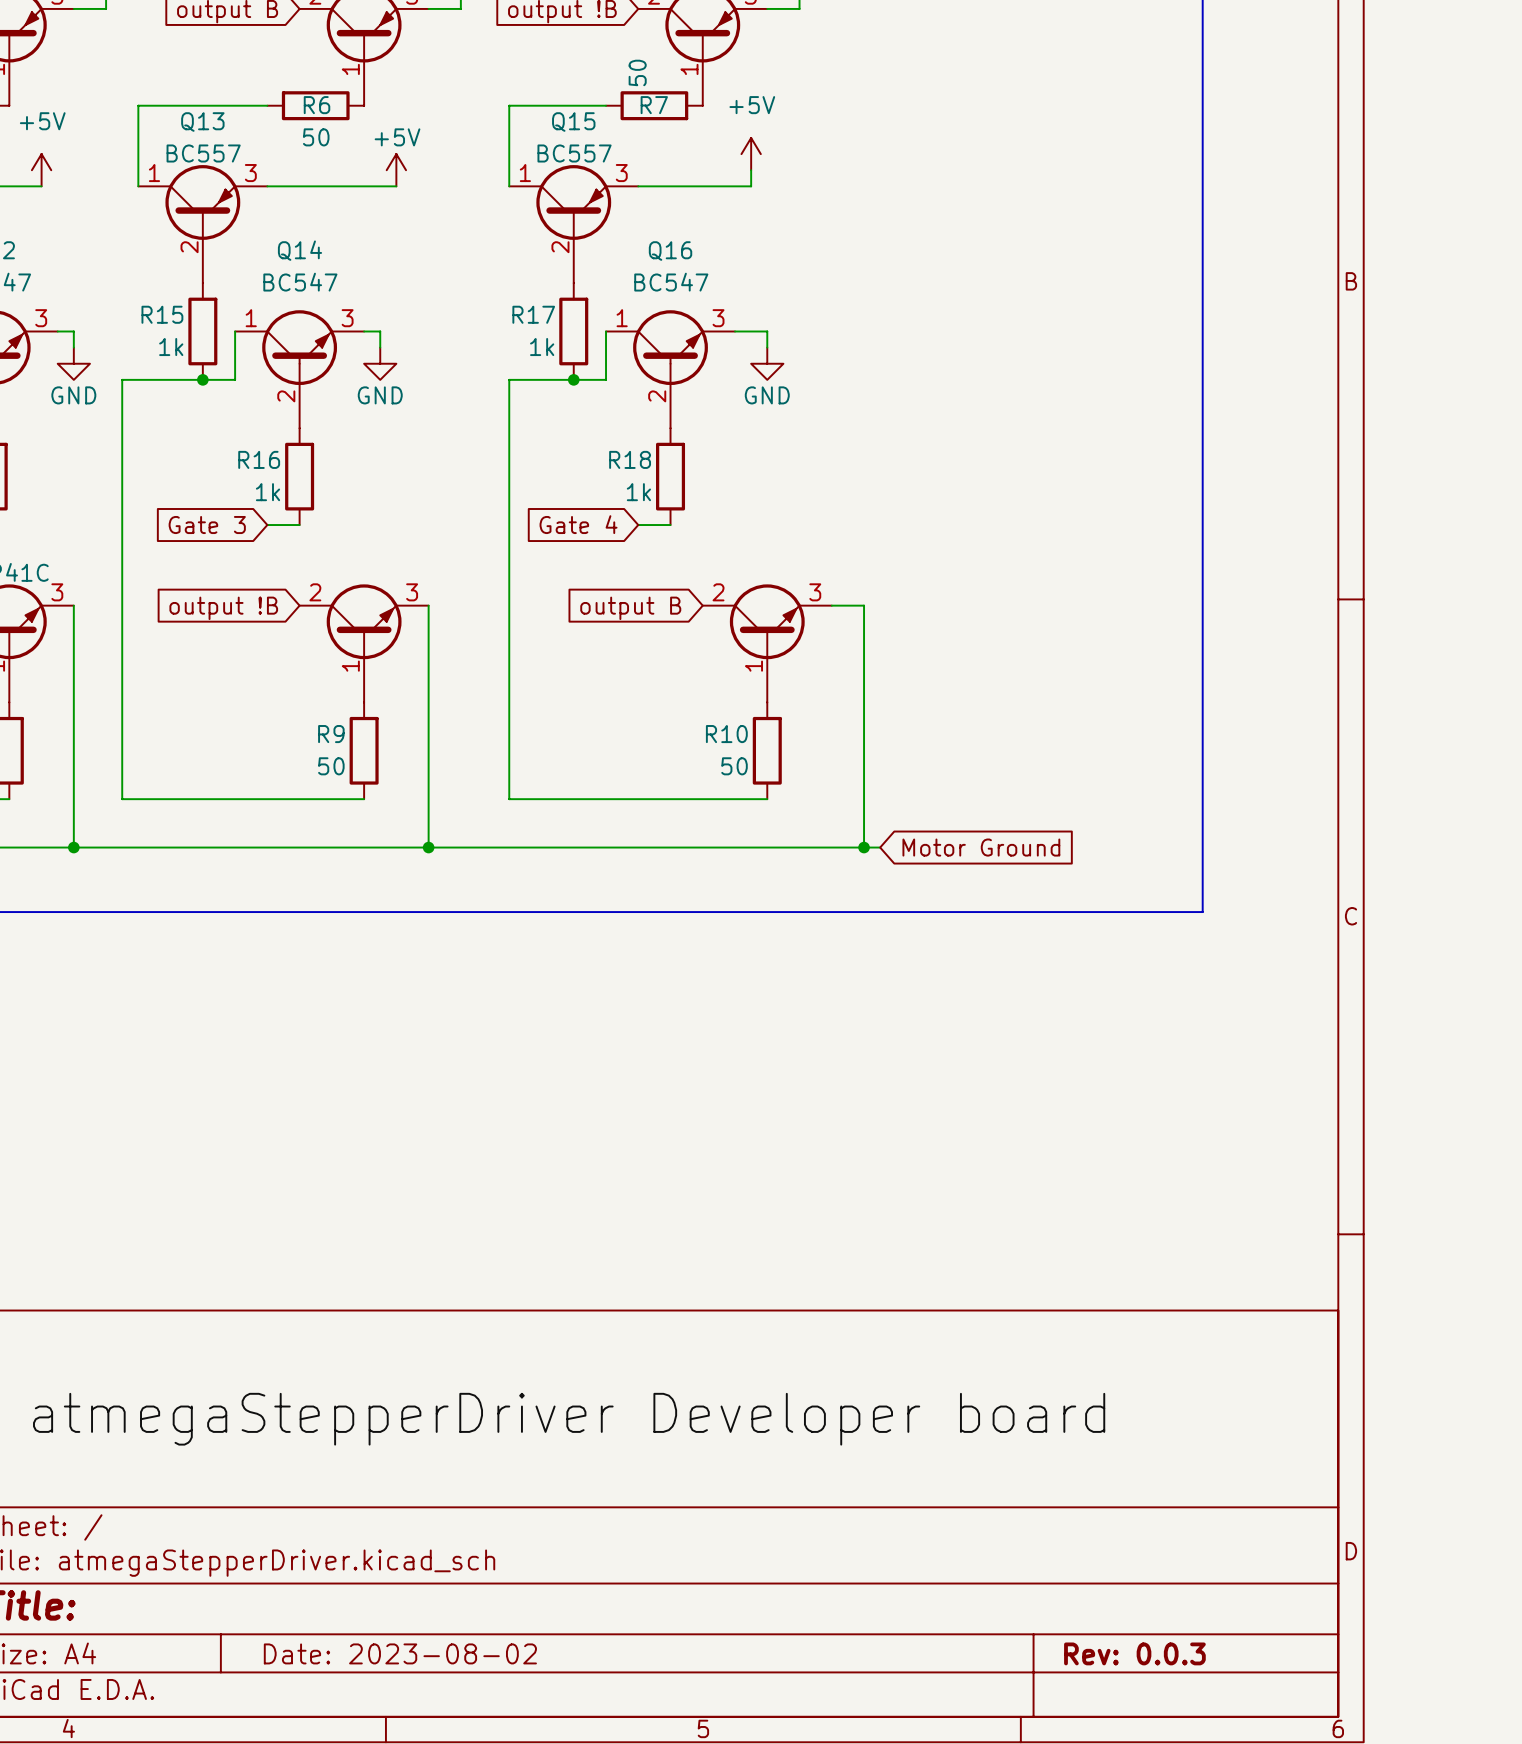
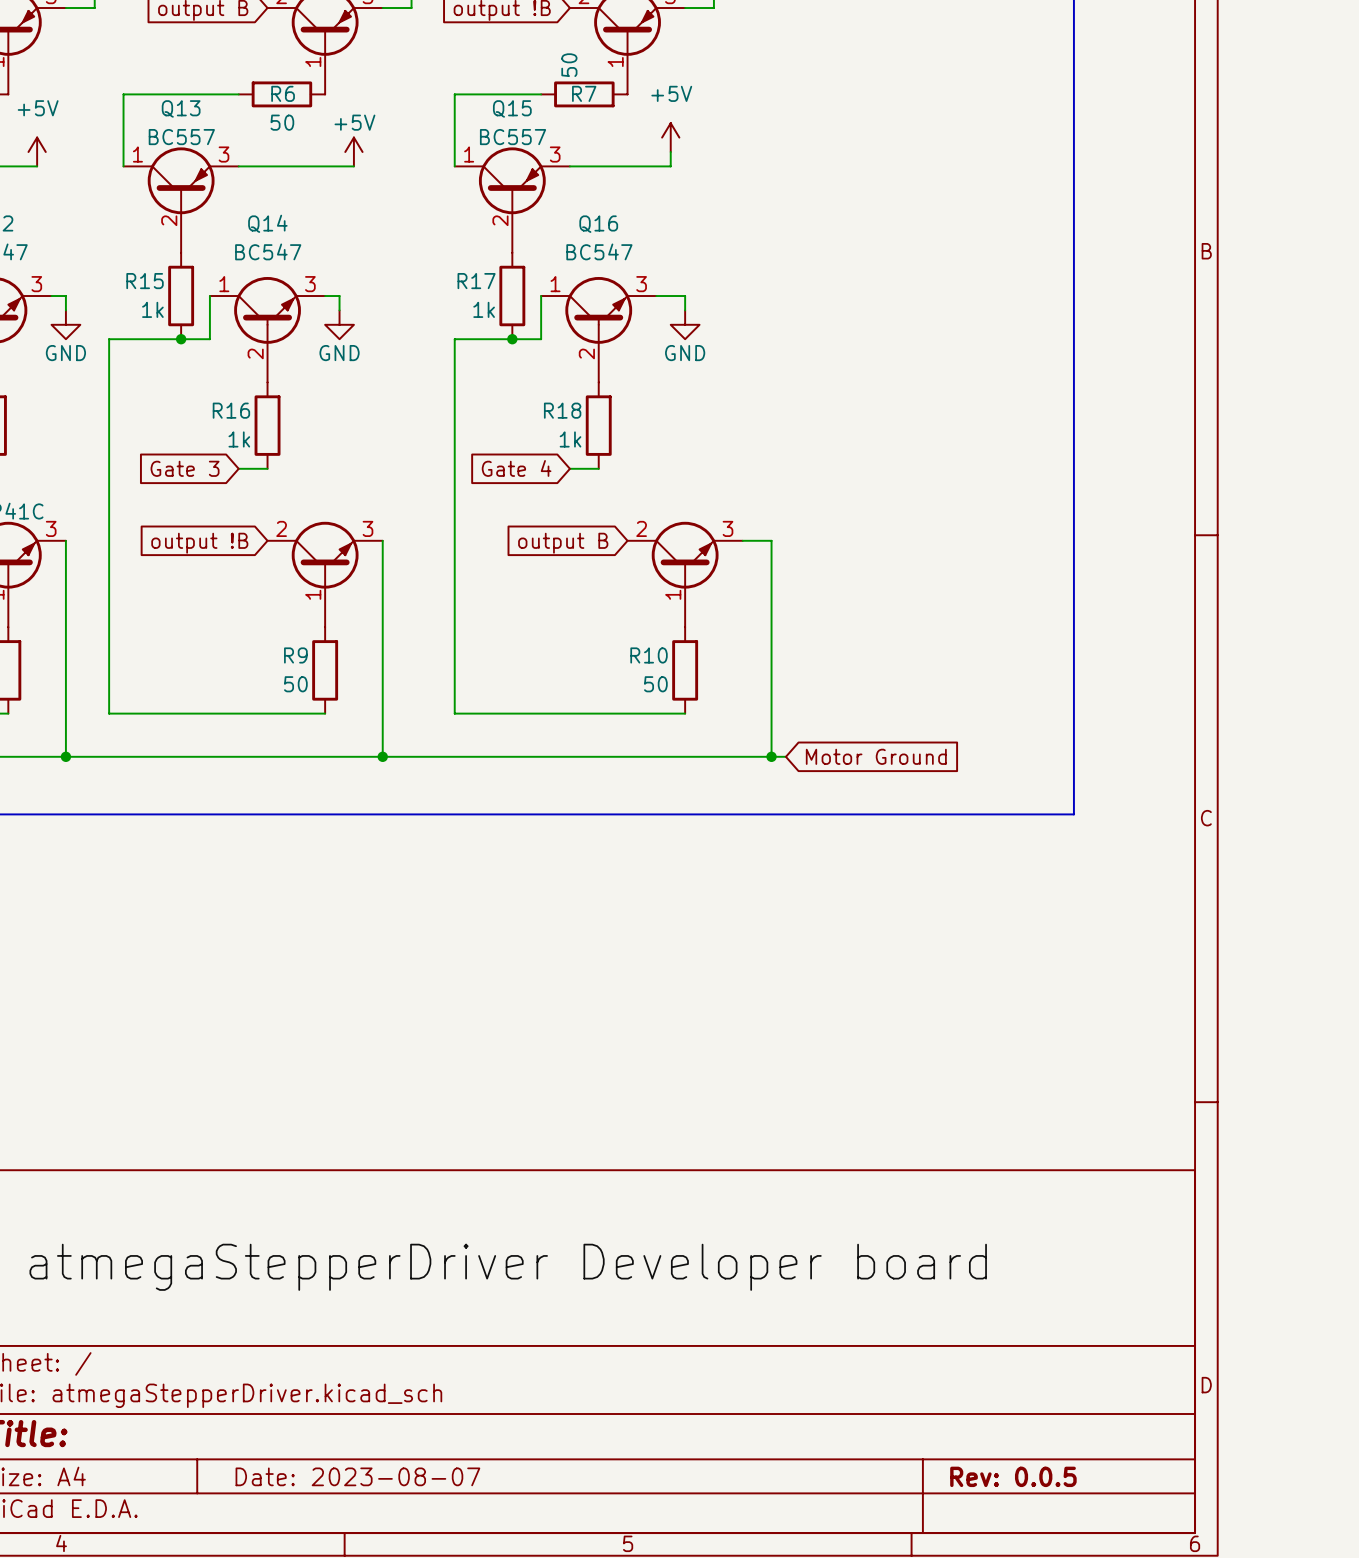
title block: Date: 2023-08-02 (400, 1653) -> Date: 2023-08-07 (357, 1476)
title block: Rev: 0.0.3 (1134, 1653) -> Rev: 0.0.5 (1013, 1476)

